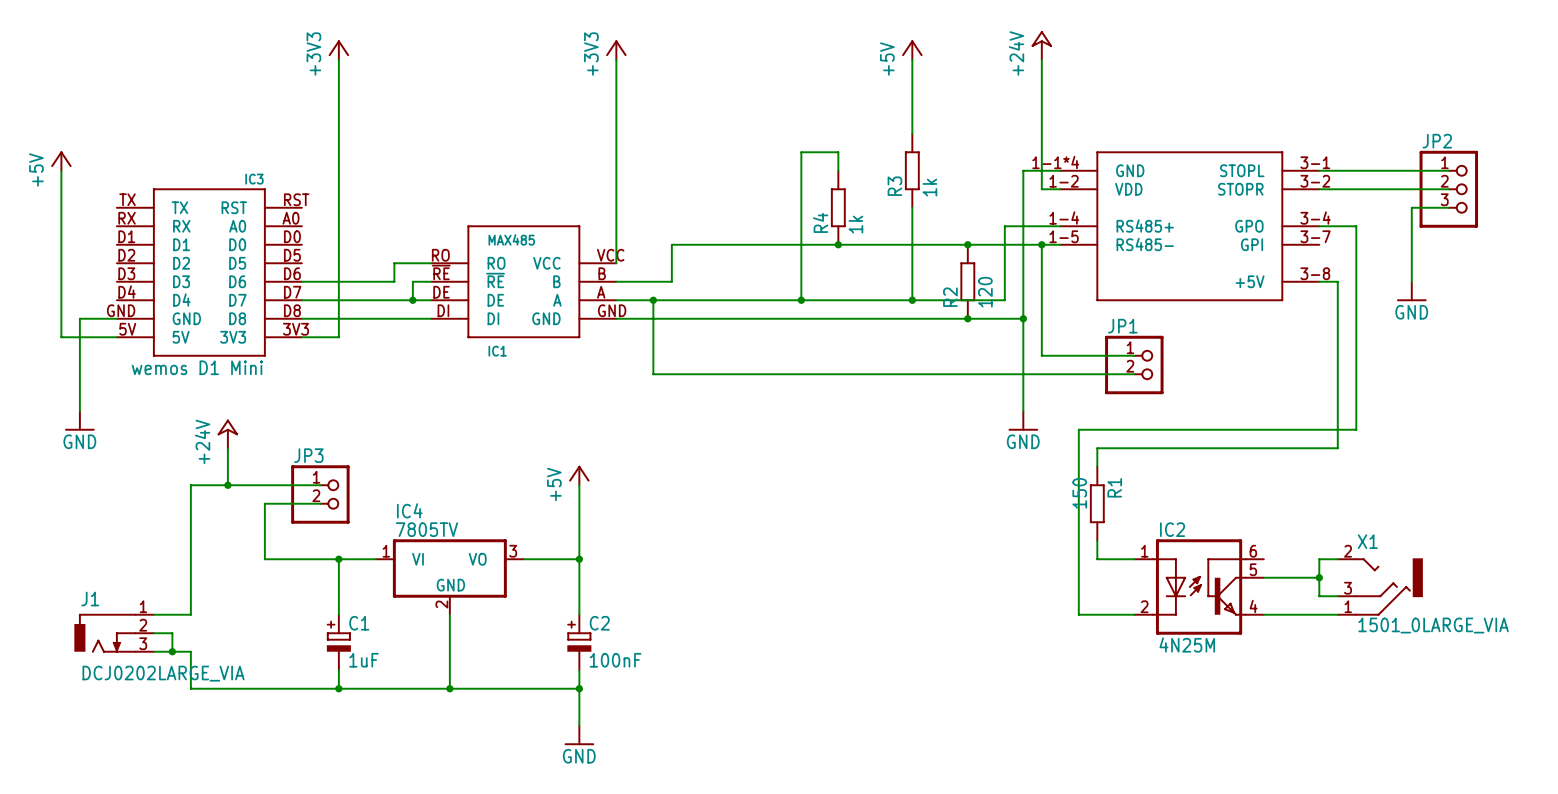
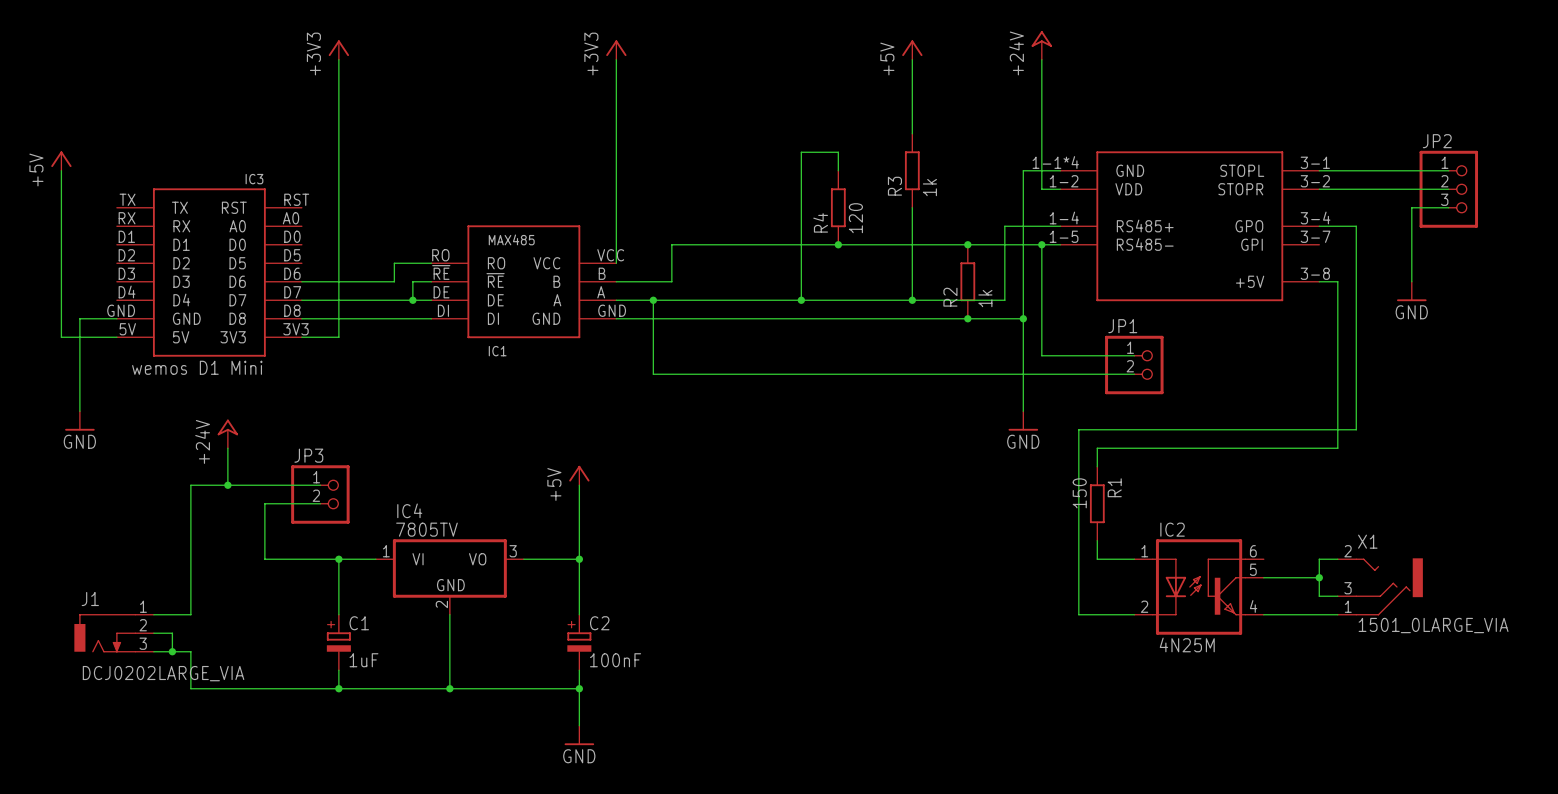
R4 value: 1k (855, 224) -> 120 (855, 218)
R2 value: 120 (985, 292) -> 1k (985, 298)

